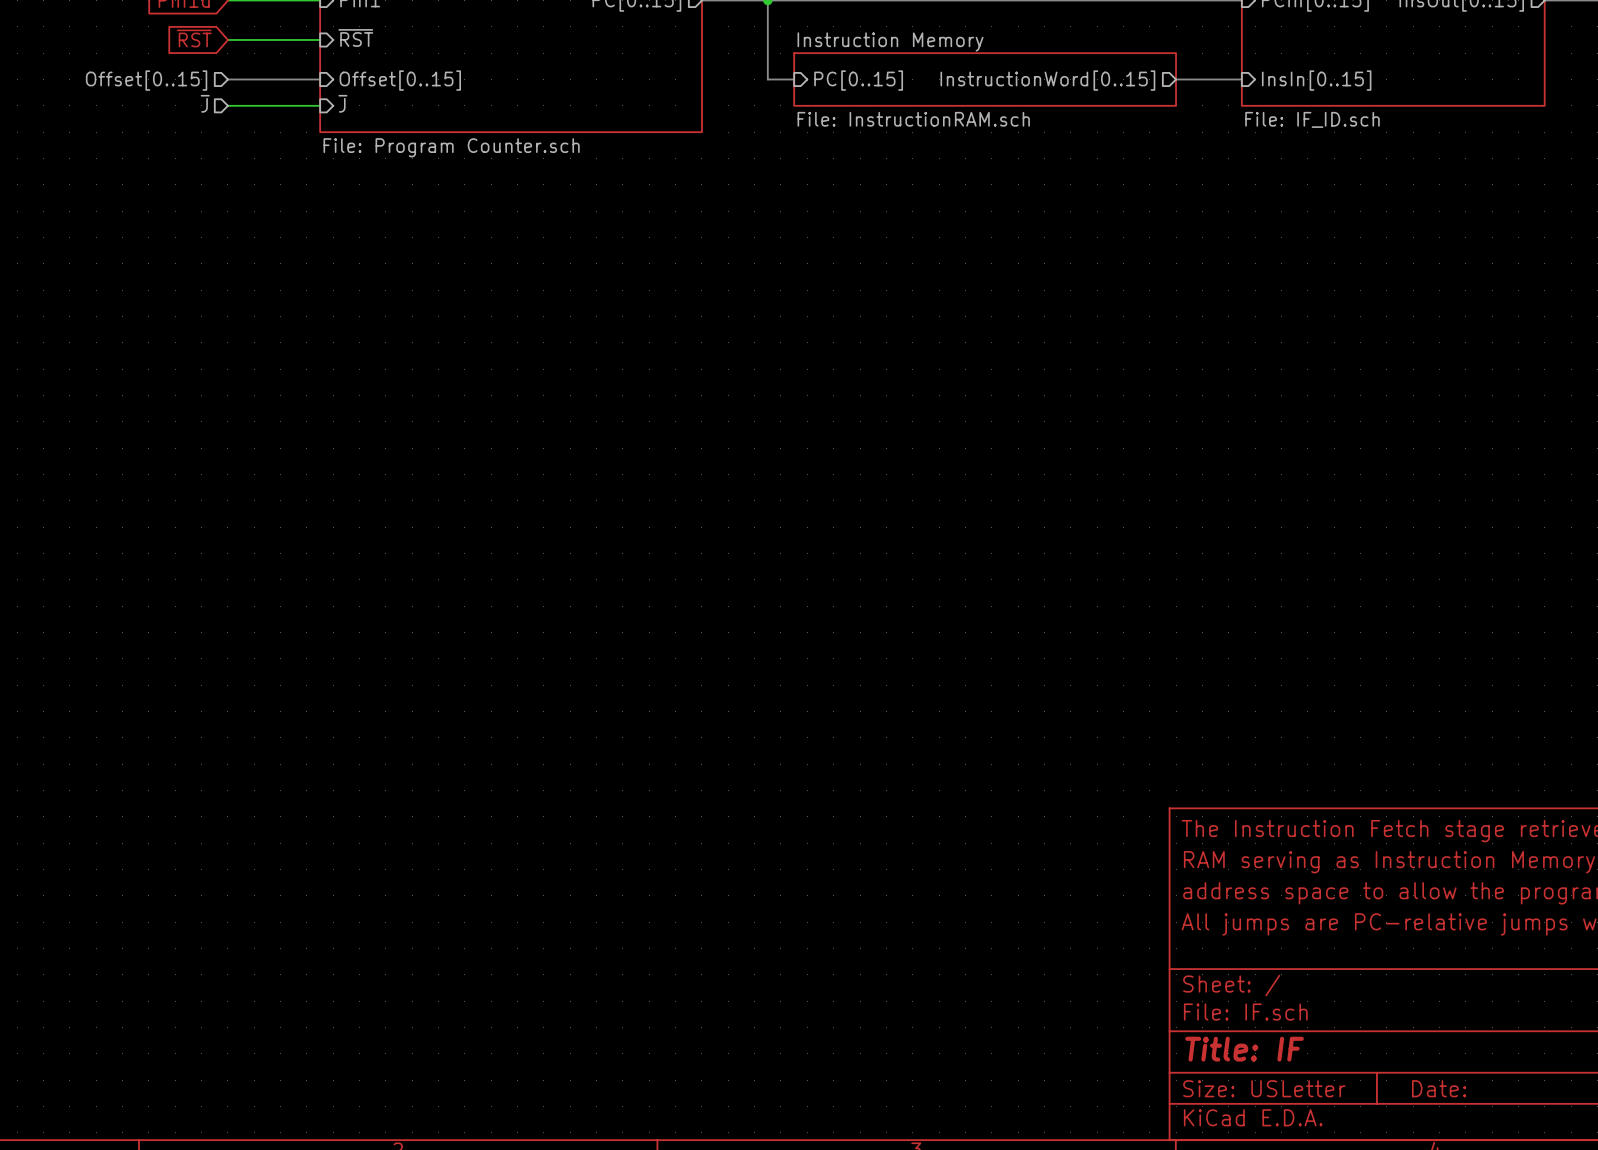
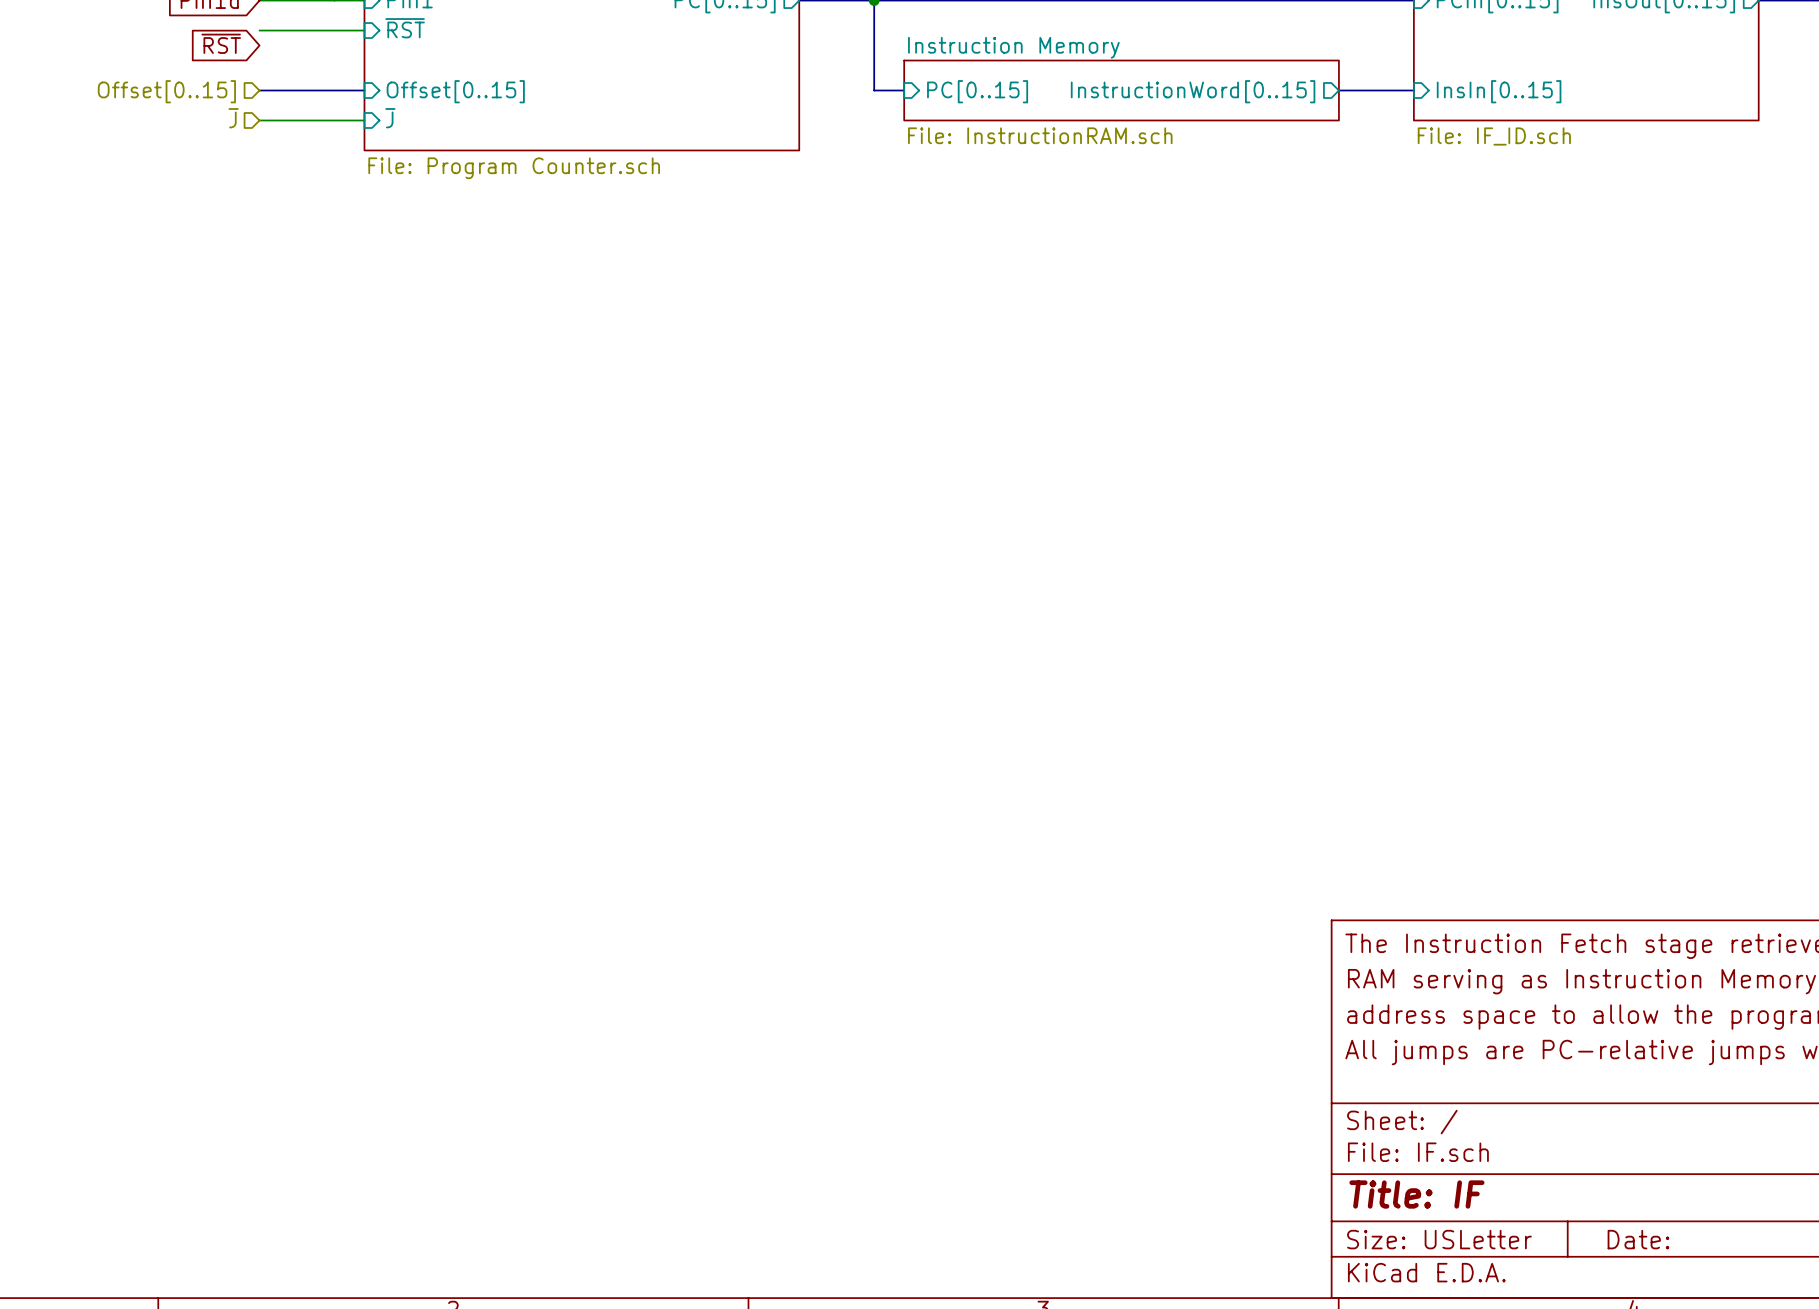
sheet pin position: ~{RST} (355, 37) -> ~{RST} (405, 28)
wire: (227, 39) (320, 39) -> (259, 30) (364, 30)

